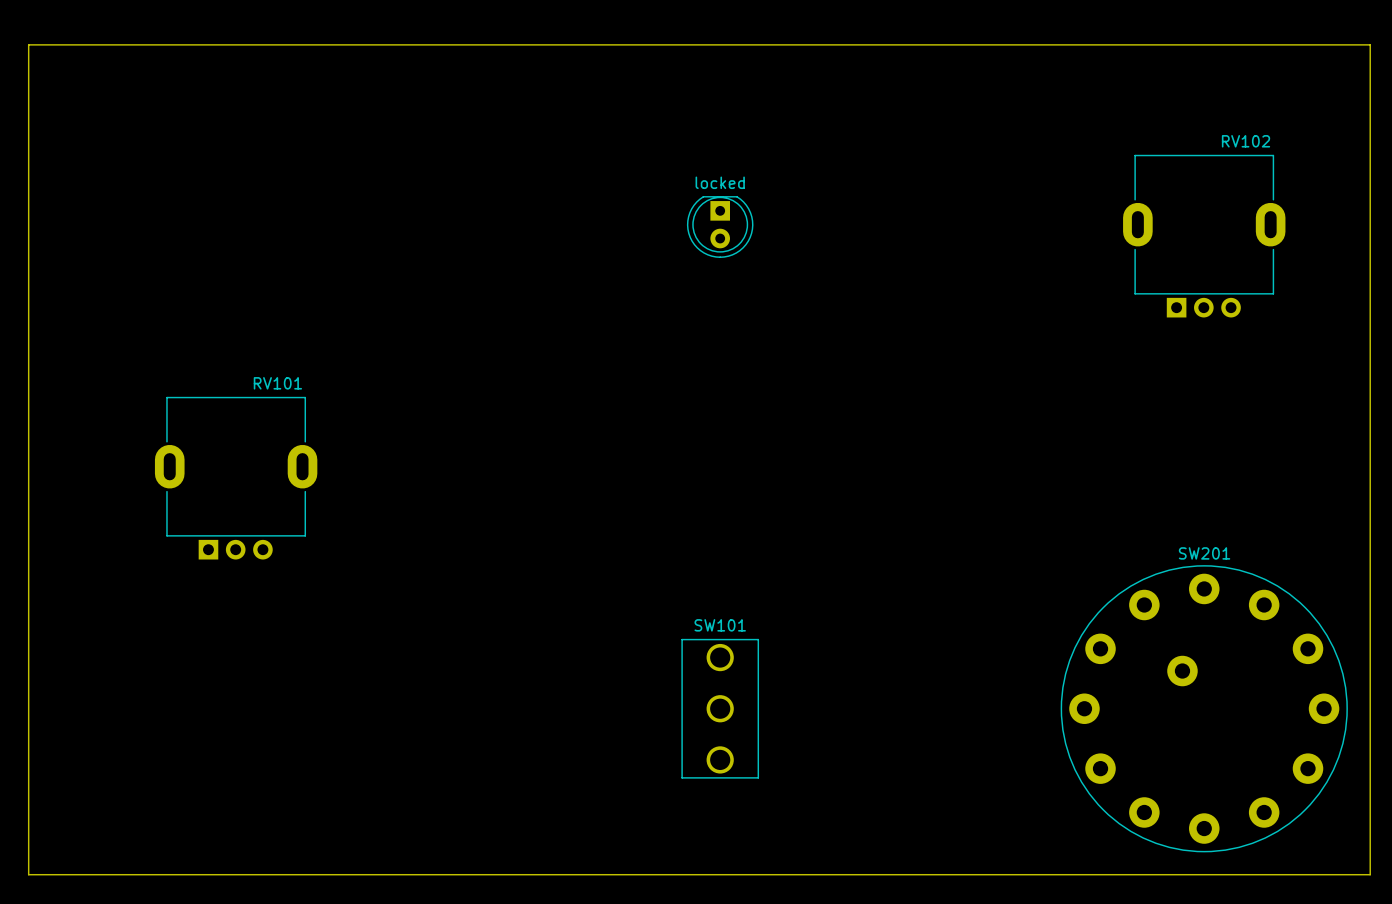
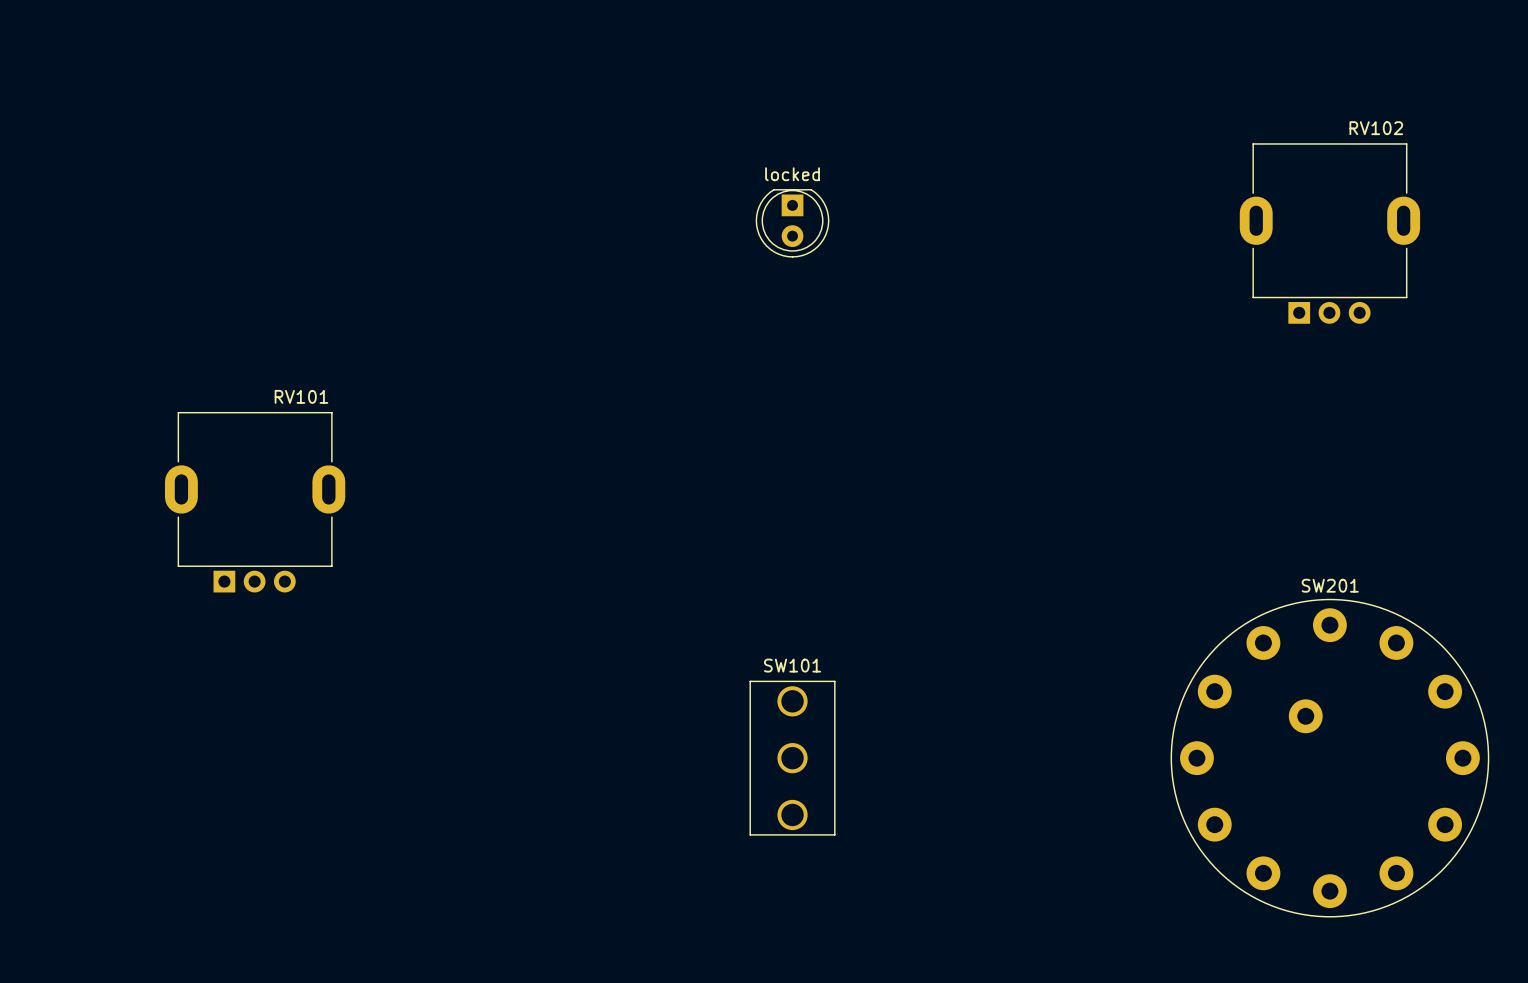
board edge: (28, 44) (1370, 44) (1370, 874) (28, 874) (28, 44) -> none

